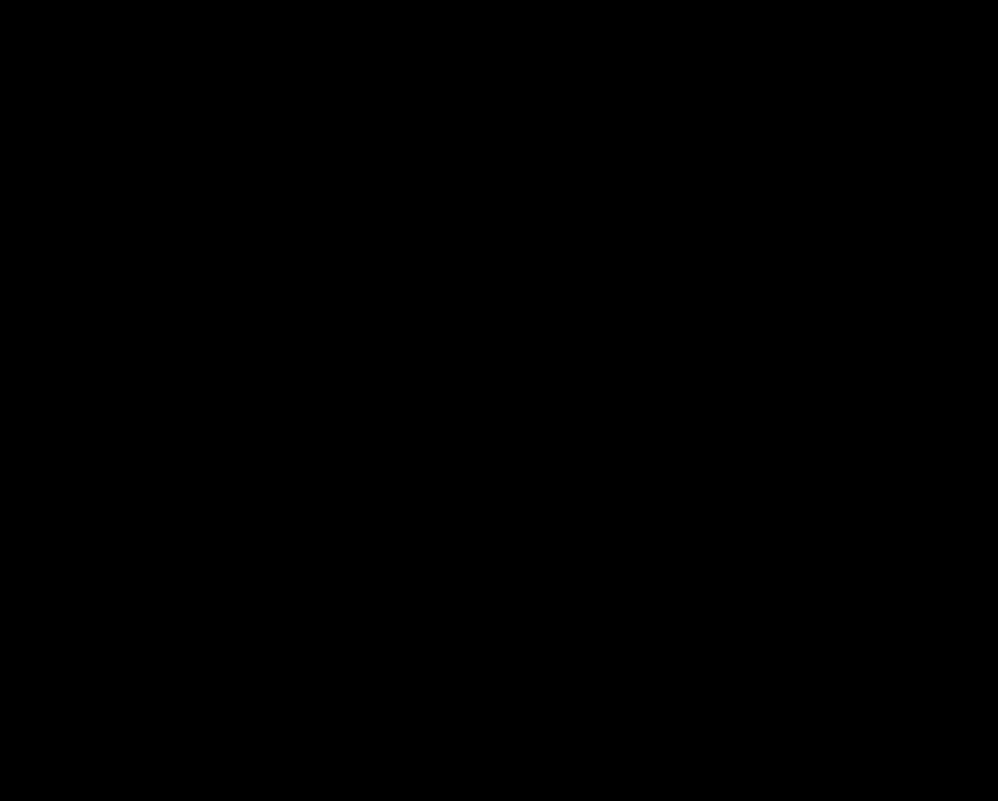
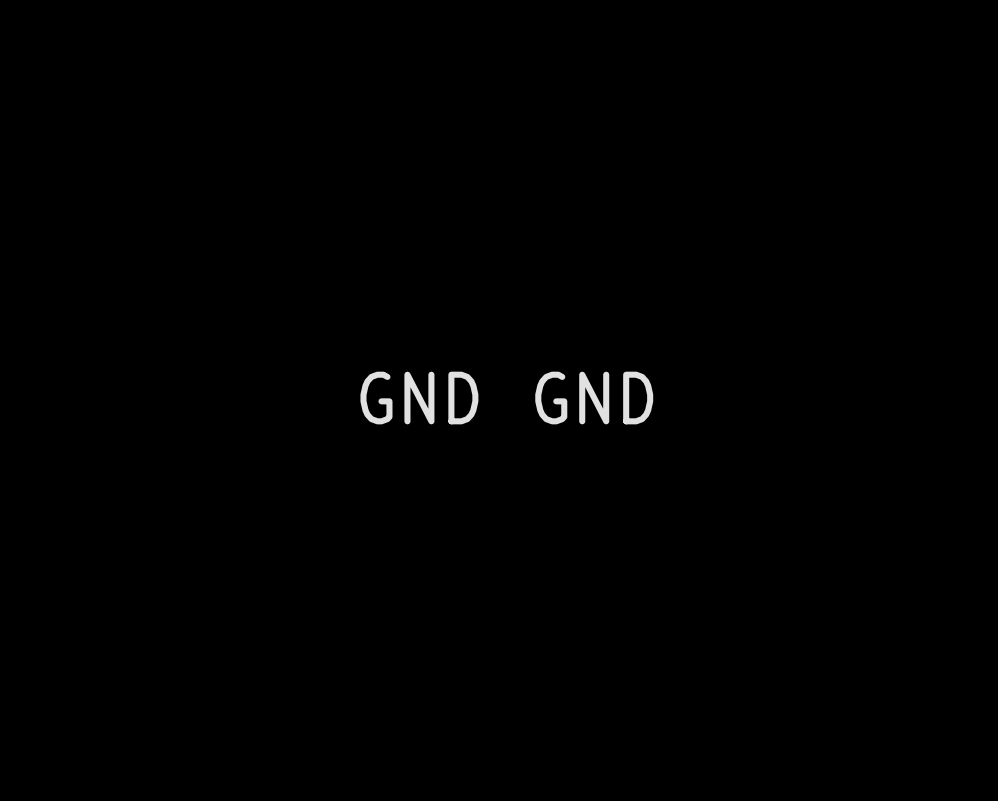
text: none -> GND (419, 398)
text: none -> GND (594, 398)

